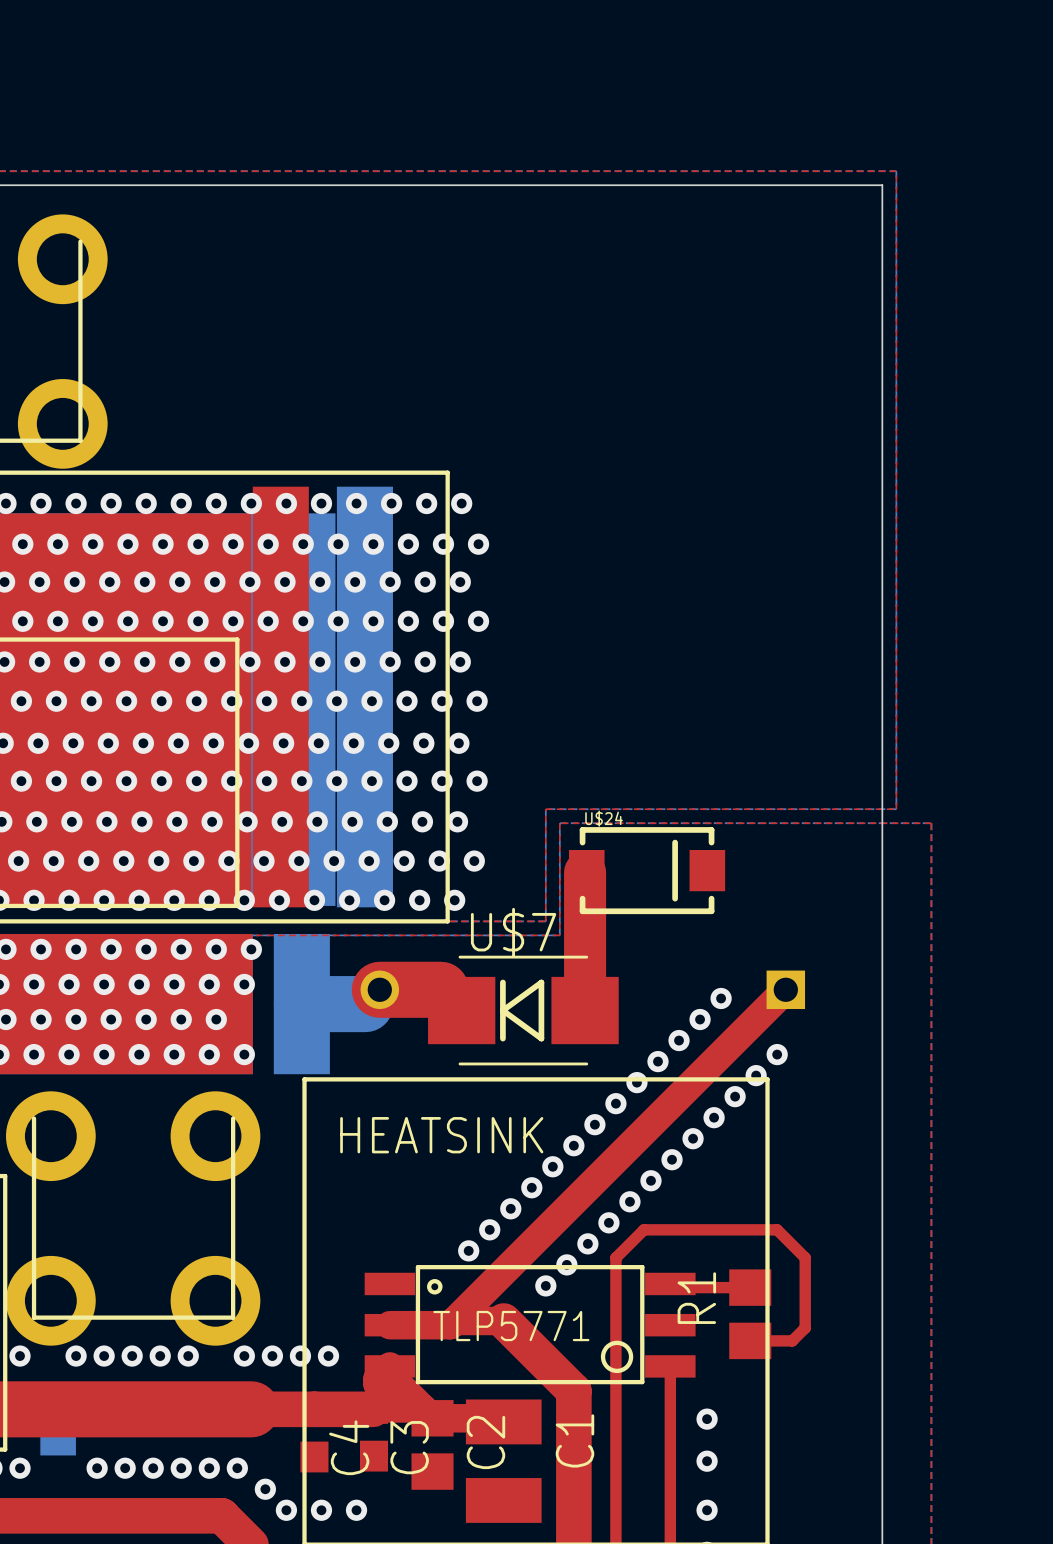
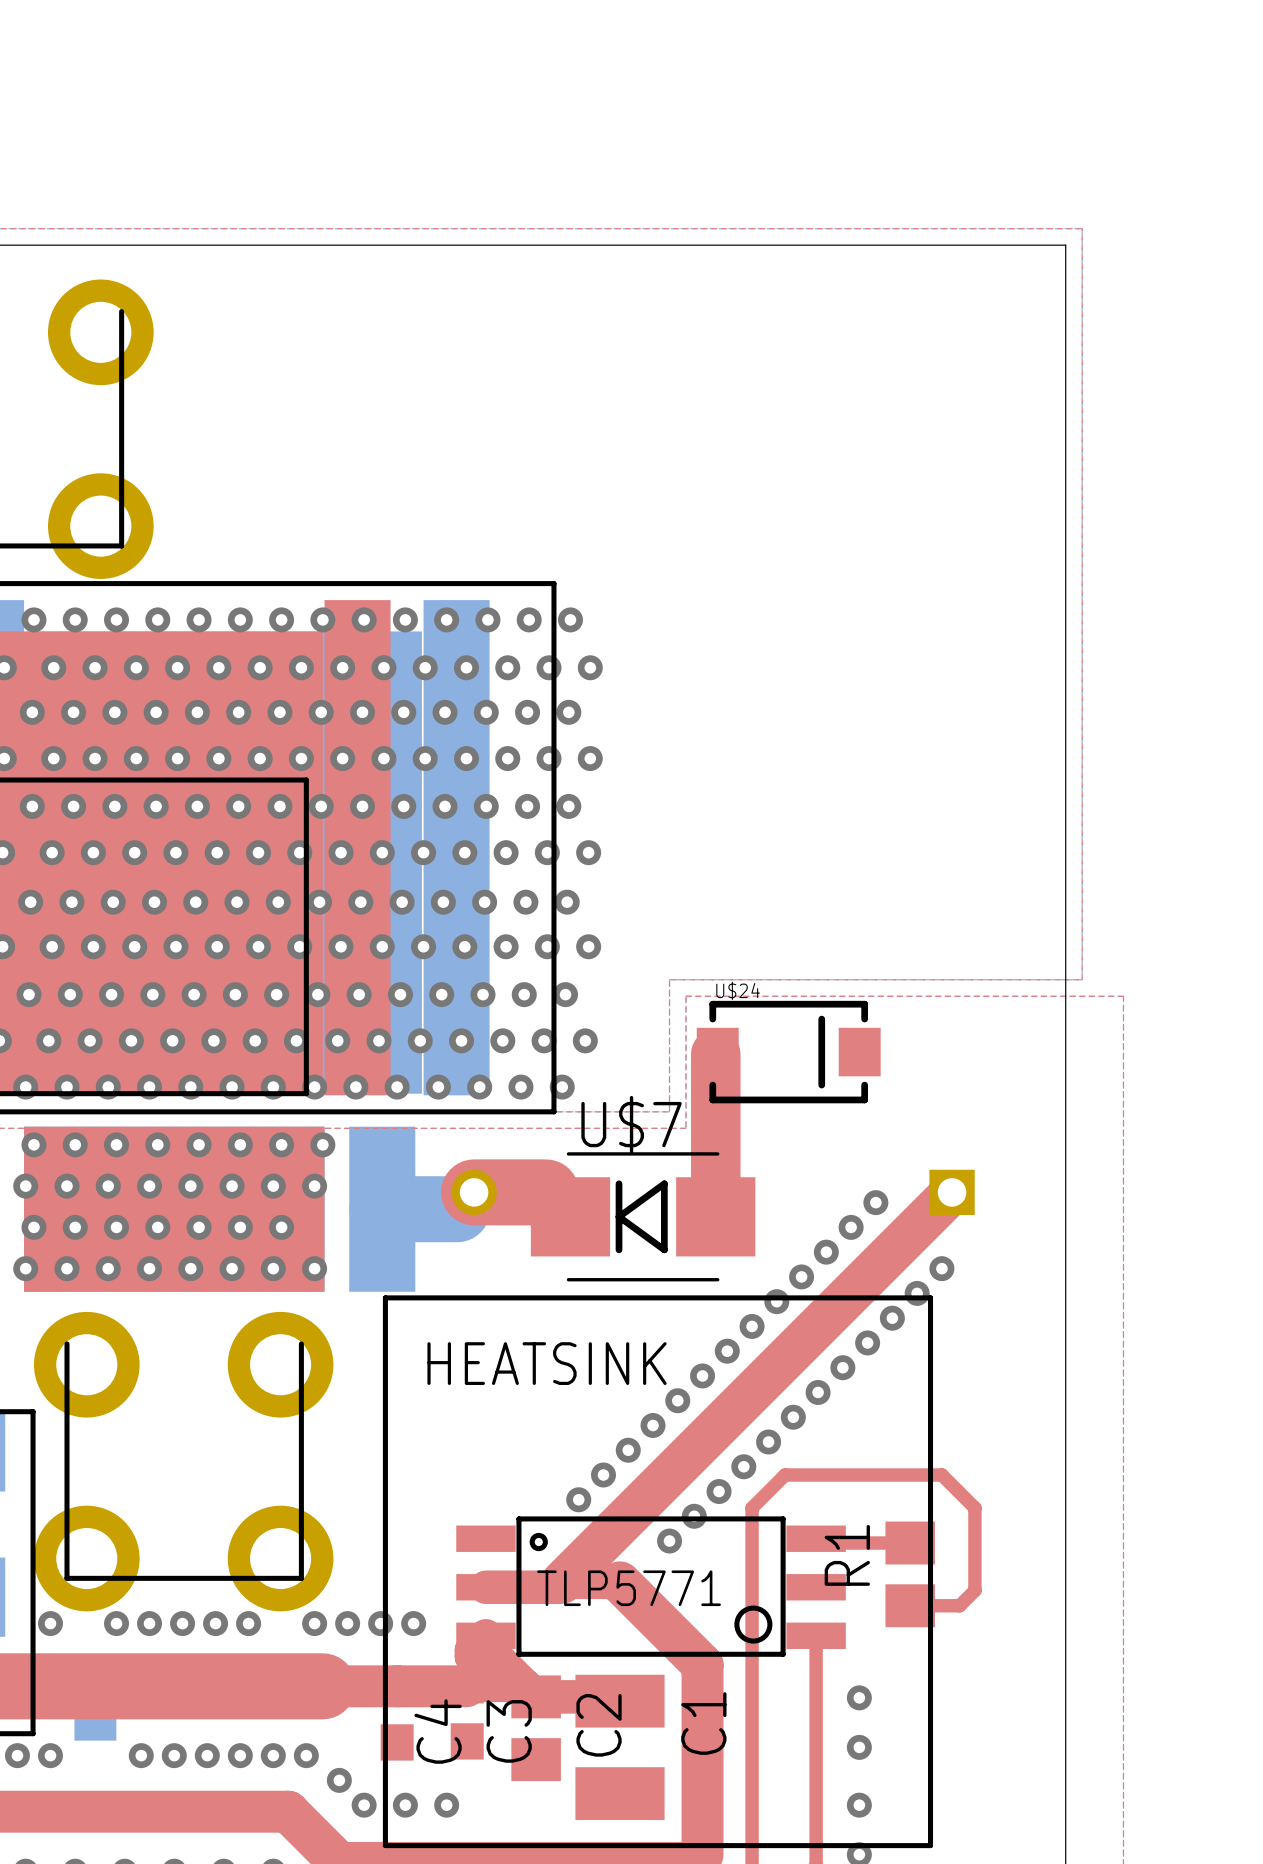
top track width: thin (785, 989) (454, 1320) -> thick (952, 1192) (562, 1582)

